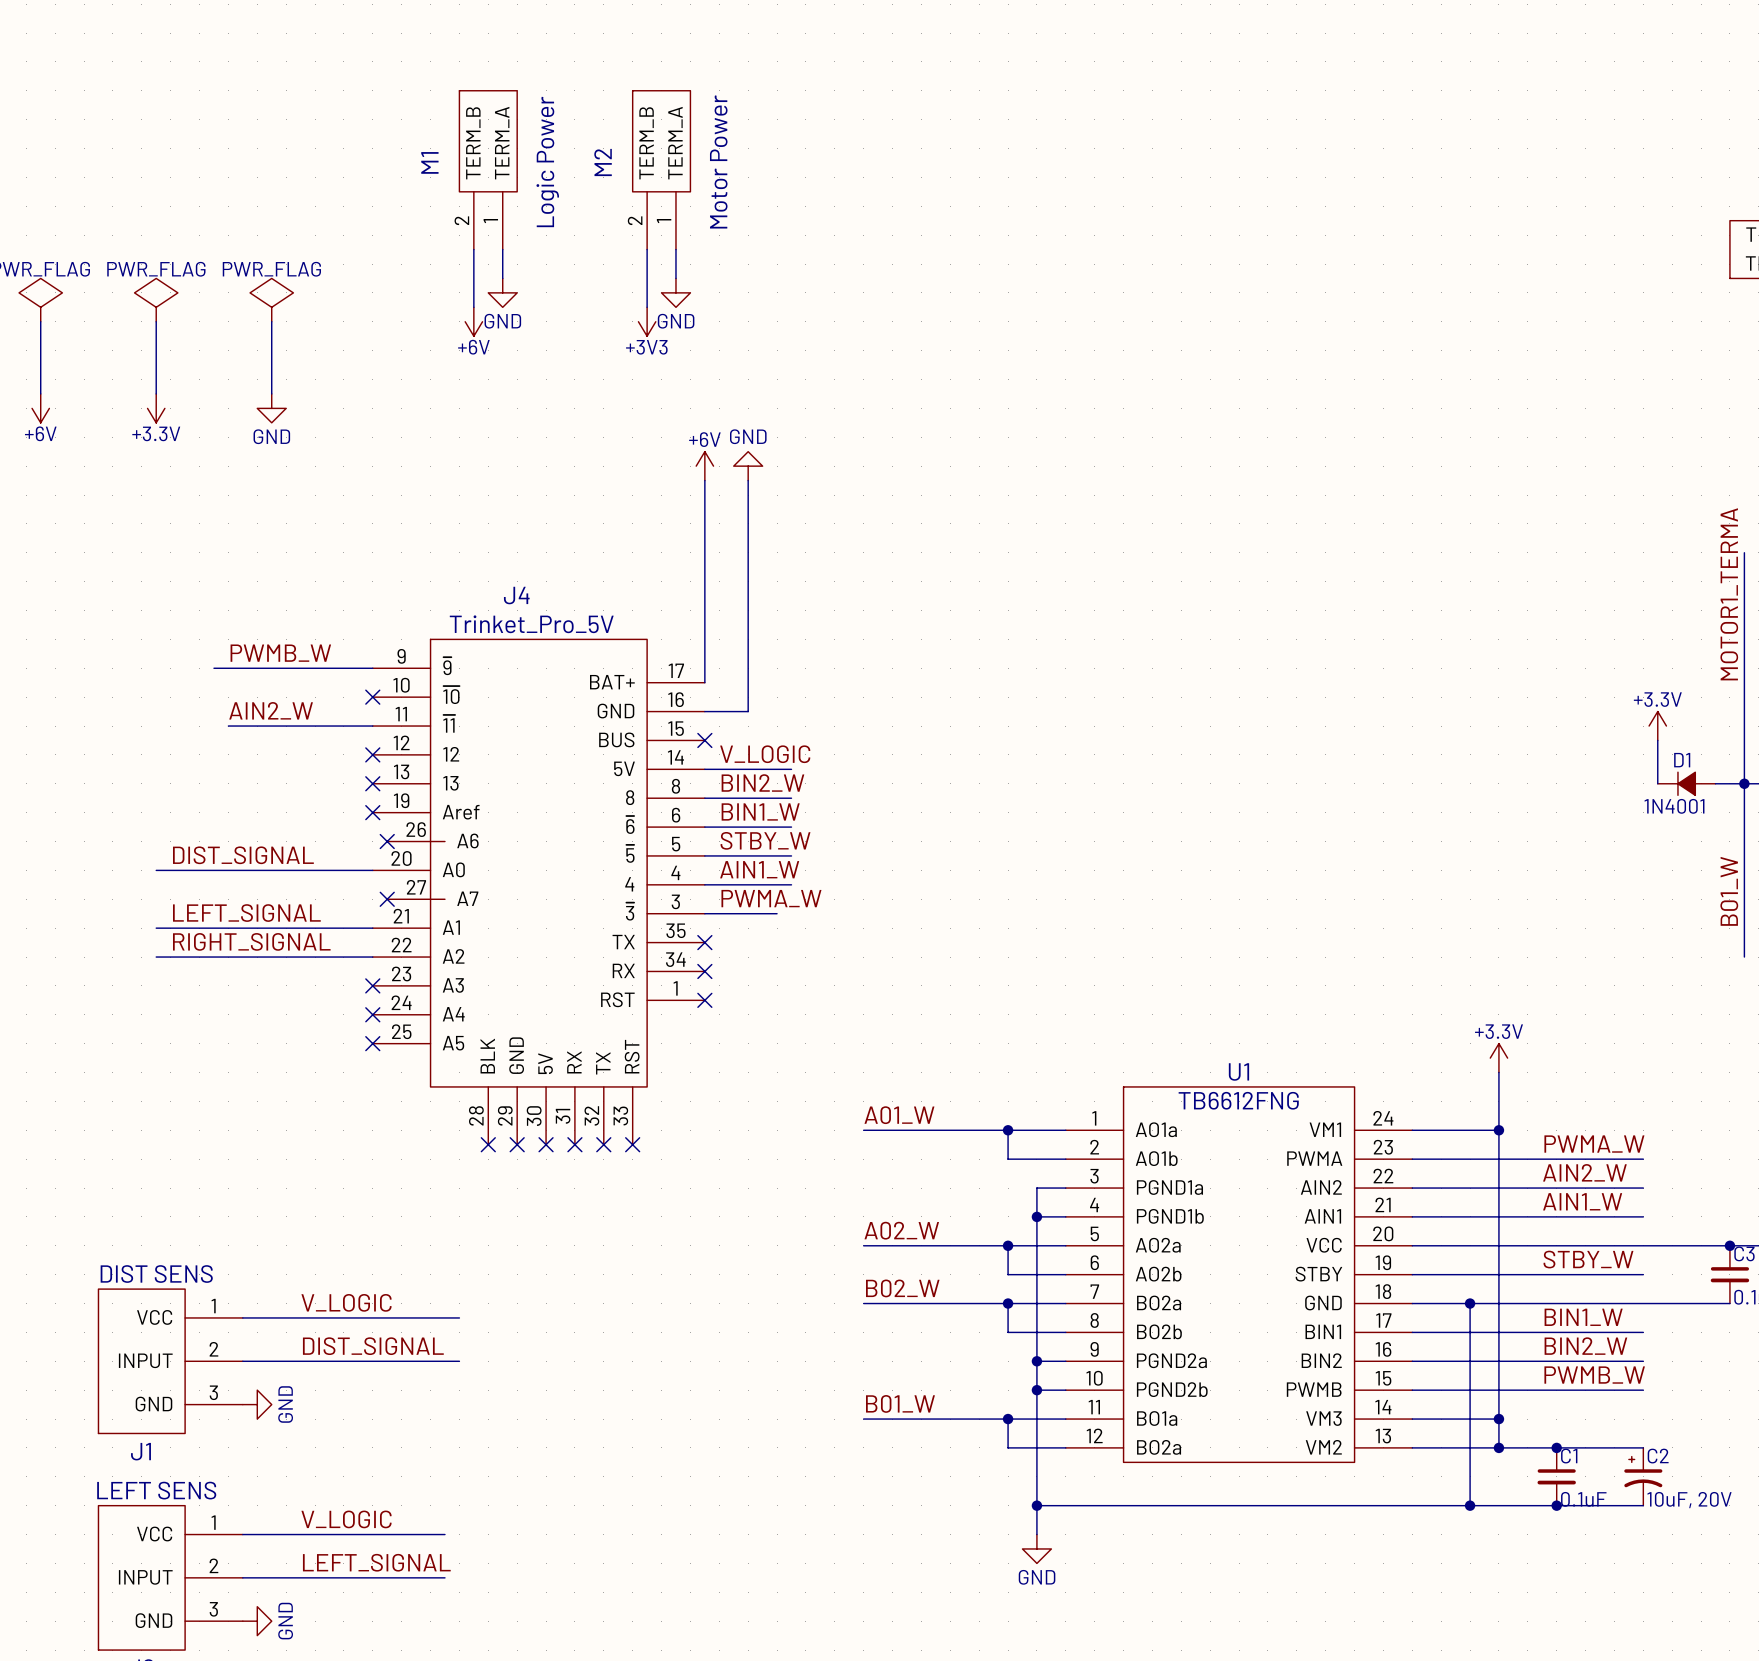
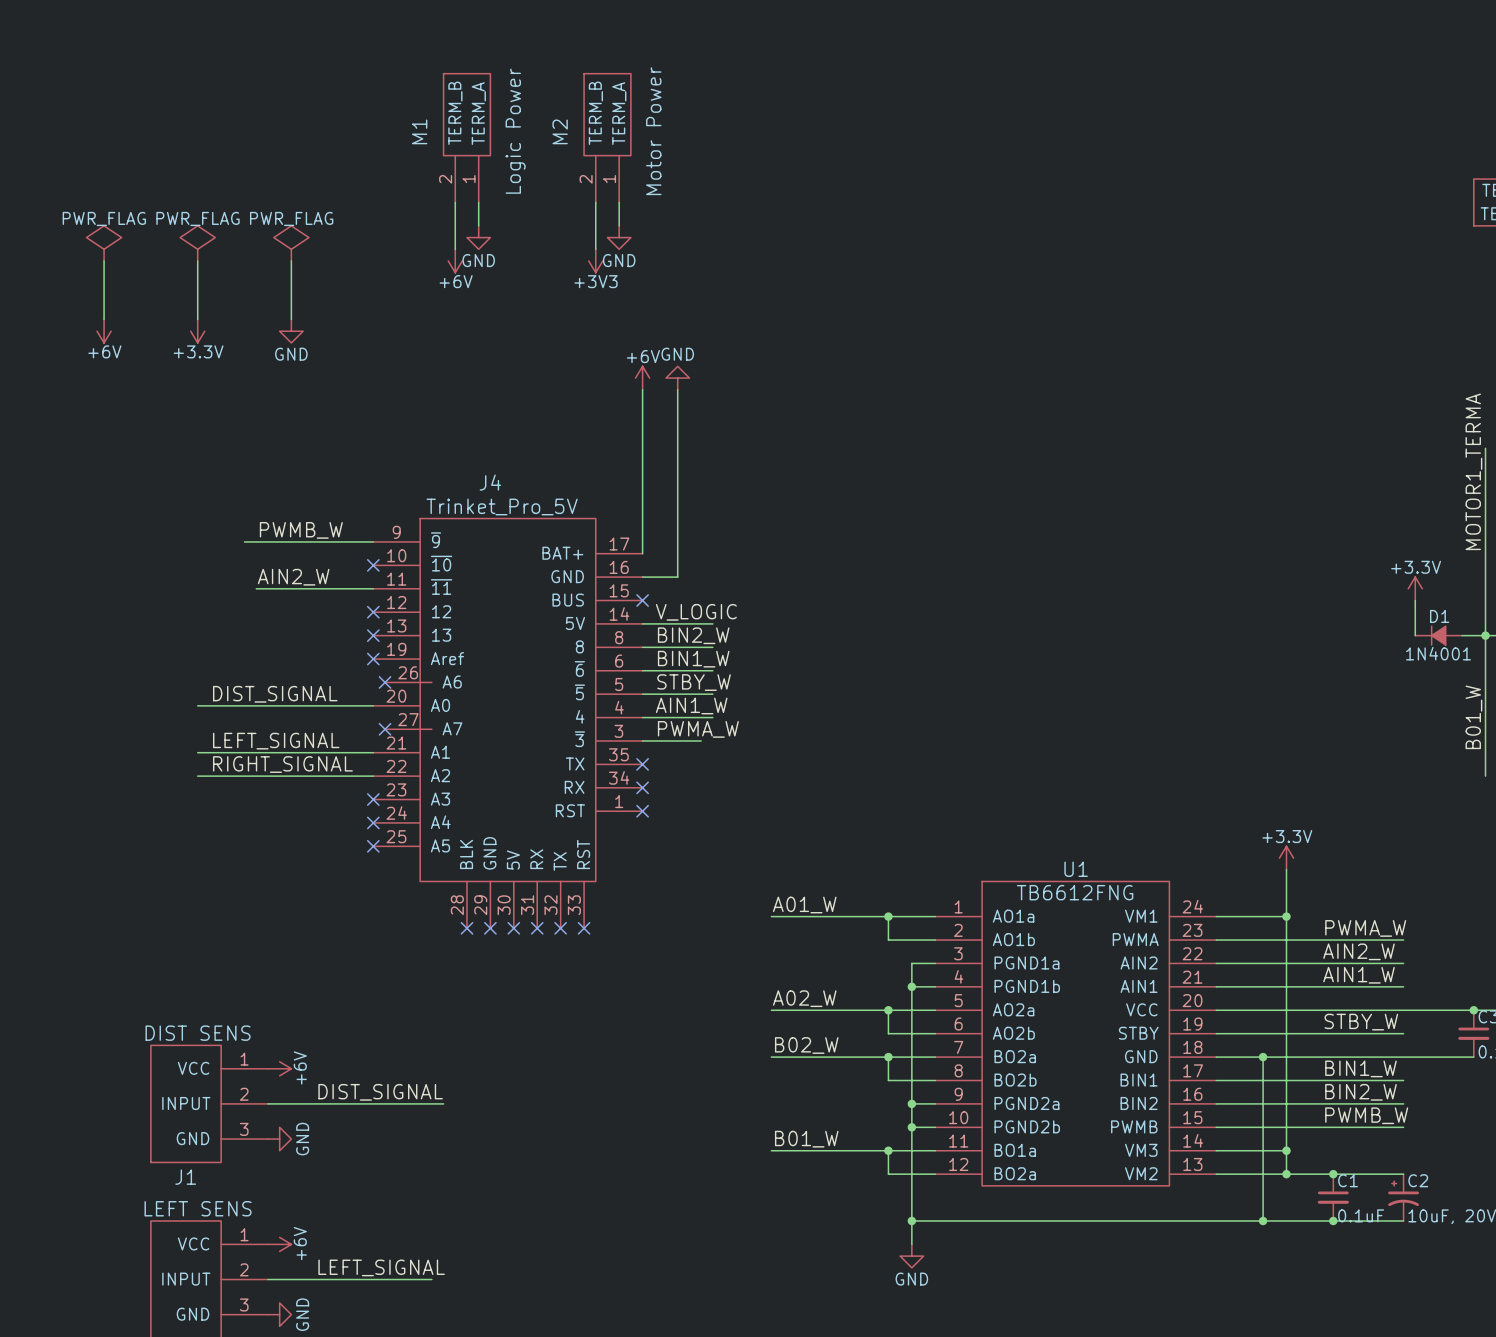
label: V_LOGIC (346, 1302) -> none
wire: (242, 1317) (459, 1317) -> none
power symbol: none -> +6V (279, 1068)
label: V_LOGIC (346, 1519) -> none
wire: (242, 1534) (444, 1534) -> none
power symbol: none -> +6V (279, 1244)

